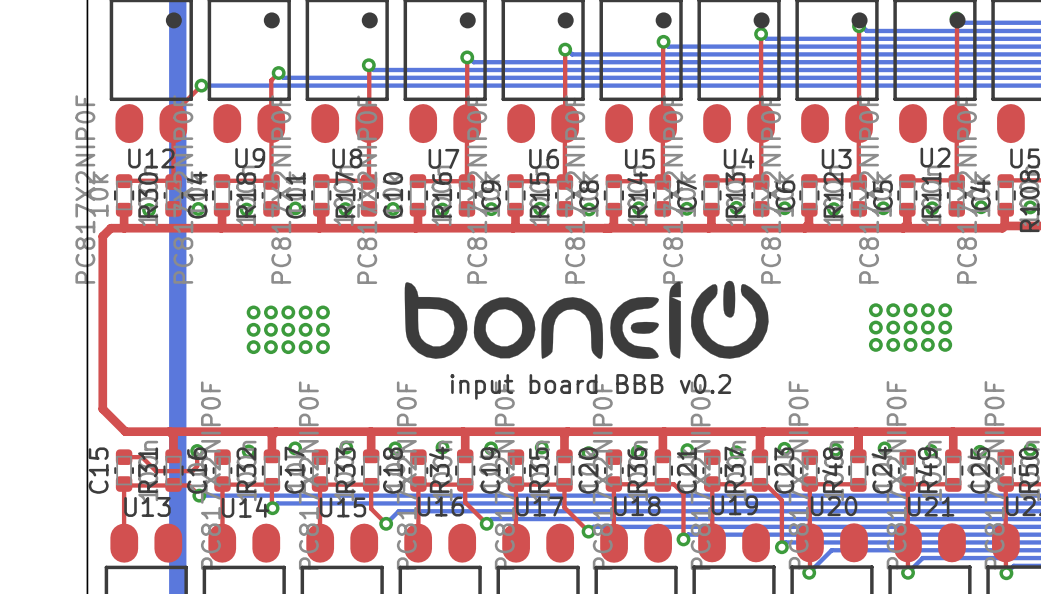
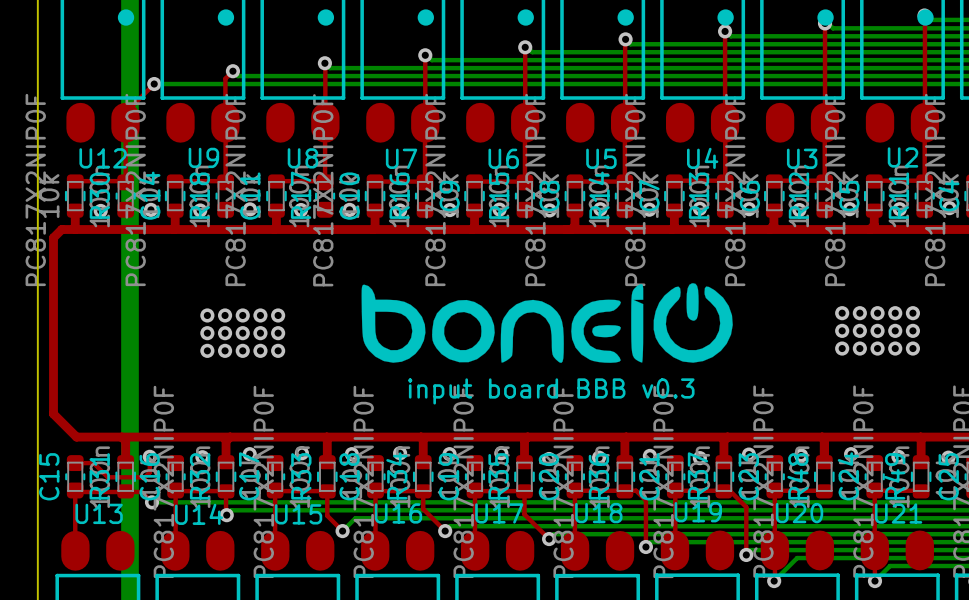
text: input board BBB v0.2 (590, 386) -> input board BBB v0.3 (551, 391)

